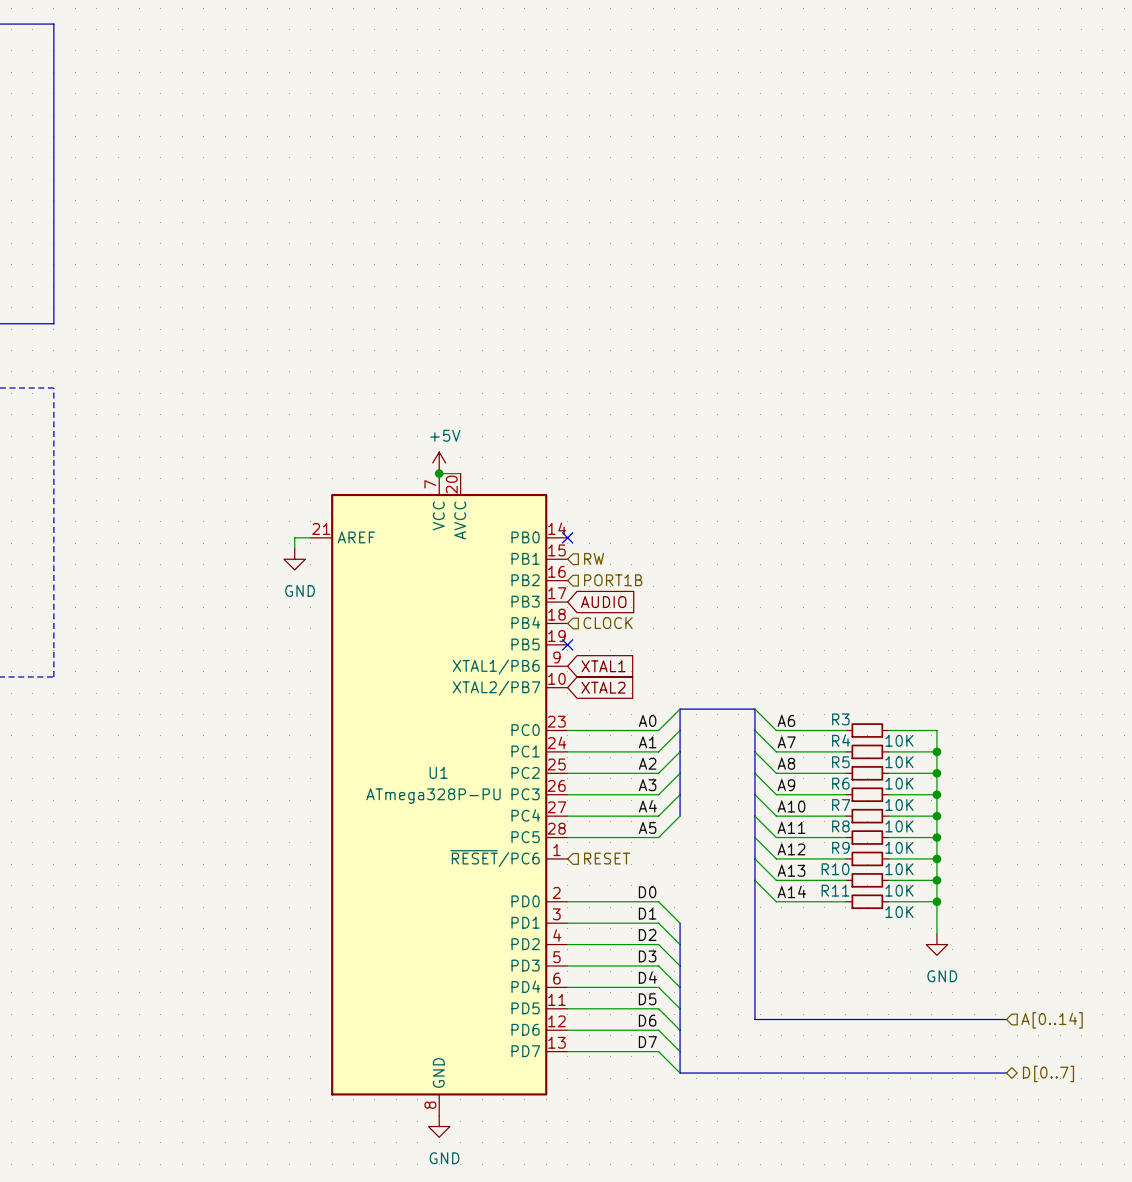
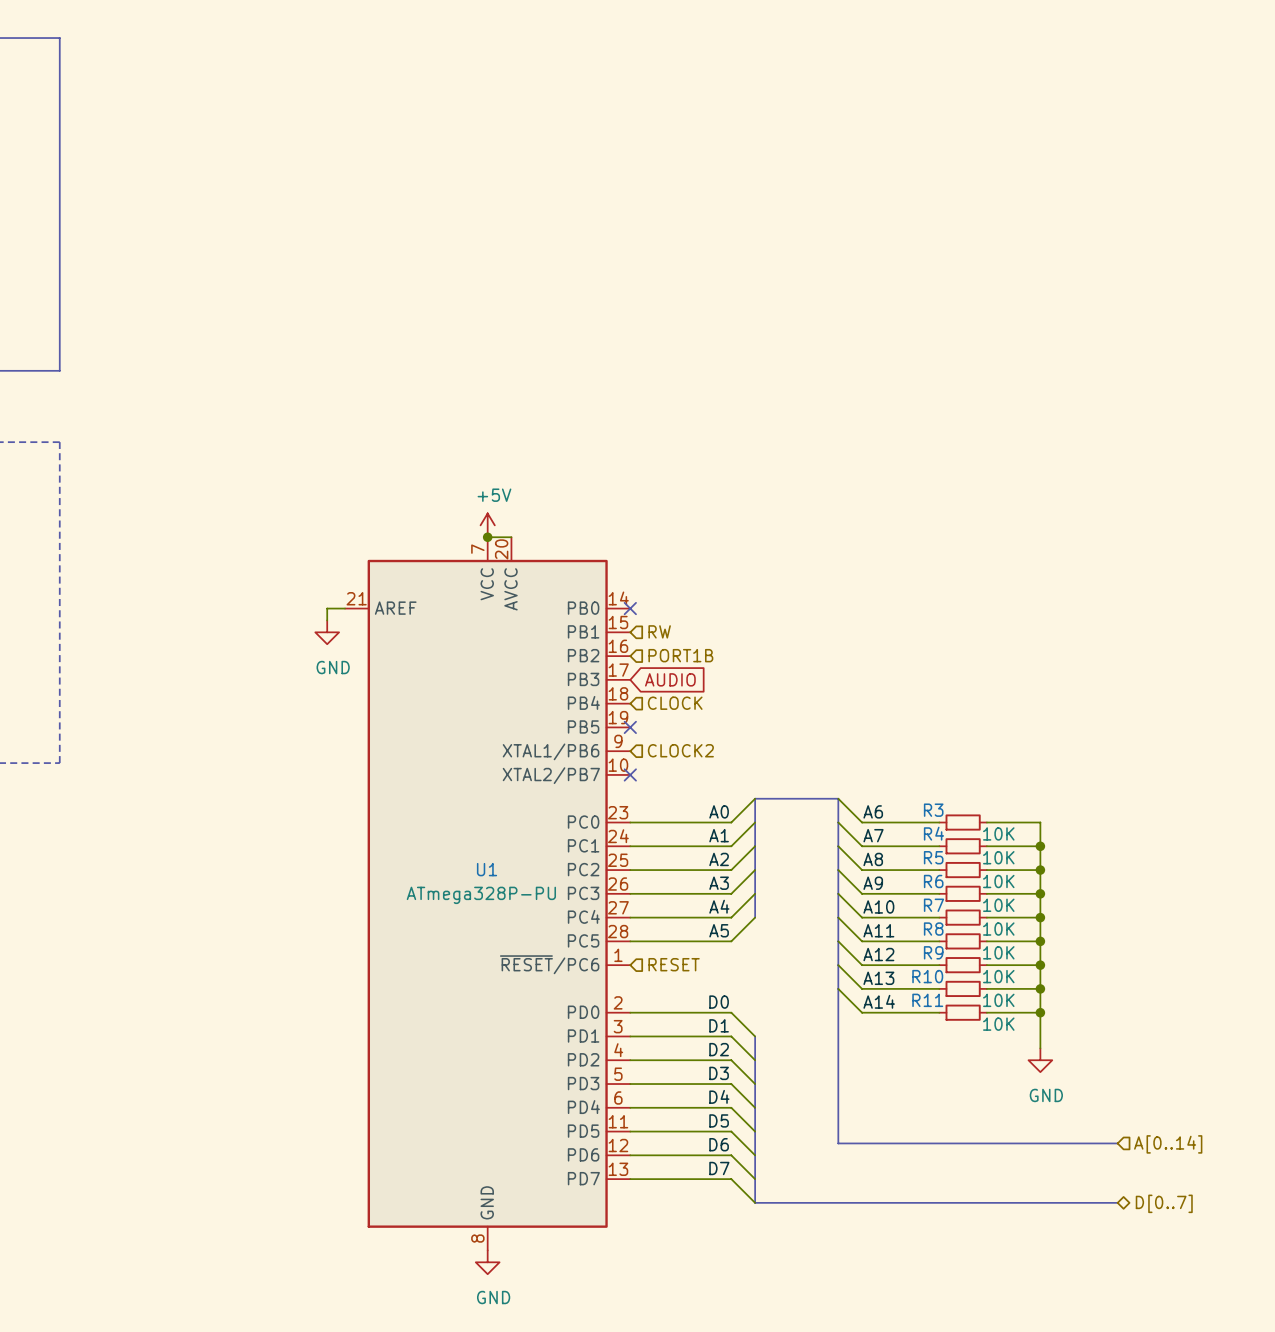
hierarchical label: none -> CLOCK2 (680, 750)
global label: XTAL1 (603, 666) -> none
no-connect mark: none -> (630, 774)
global label: XTAL2 (603, 687) -> none

